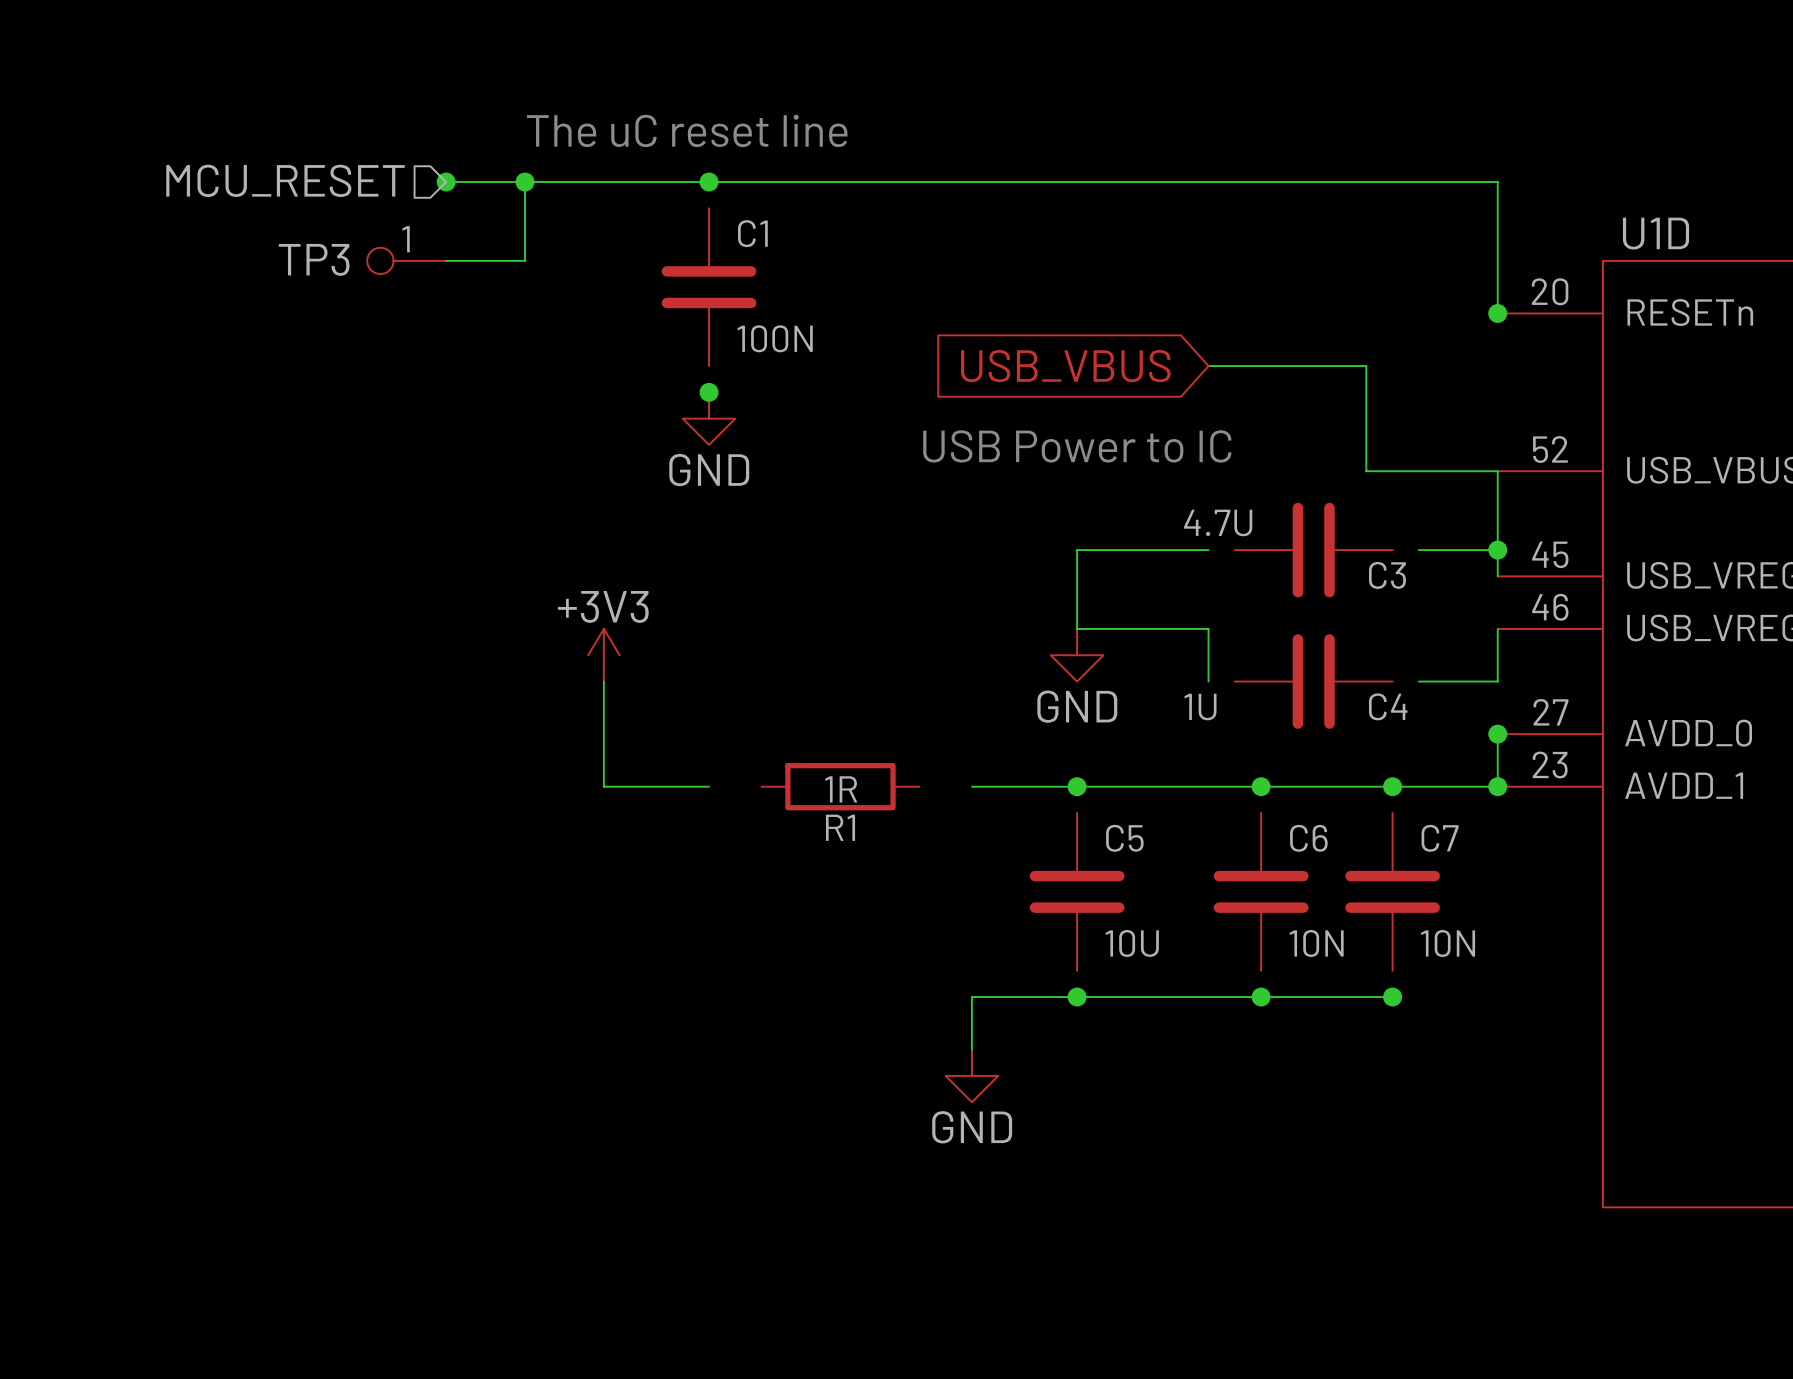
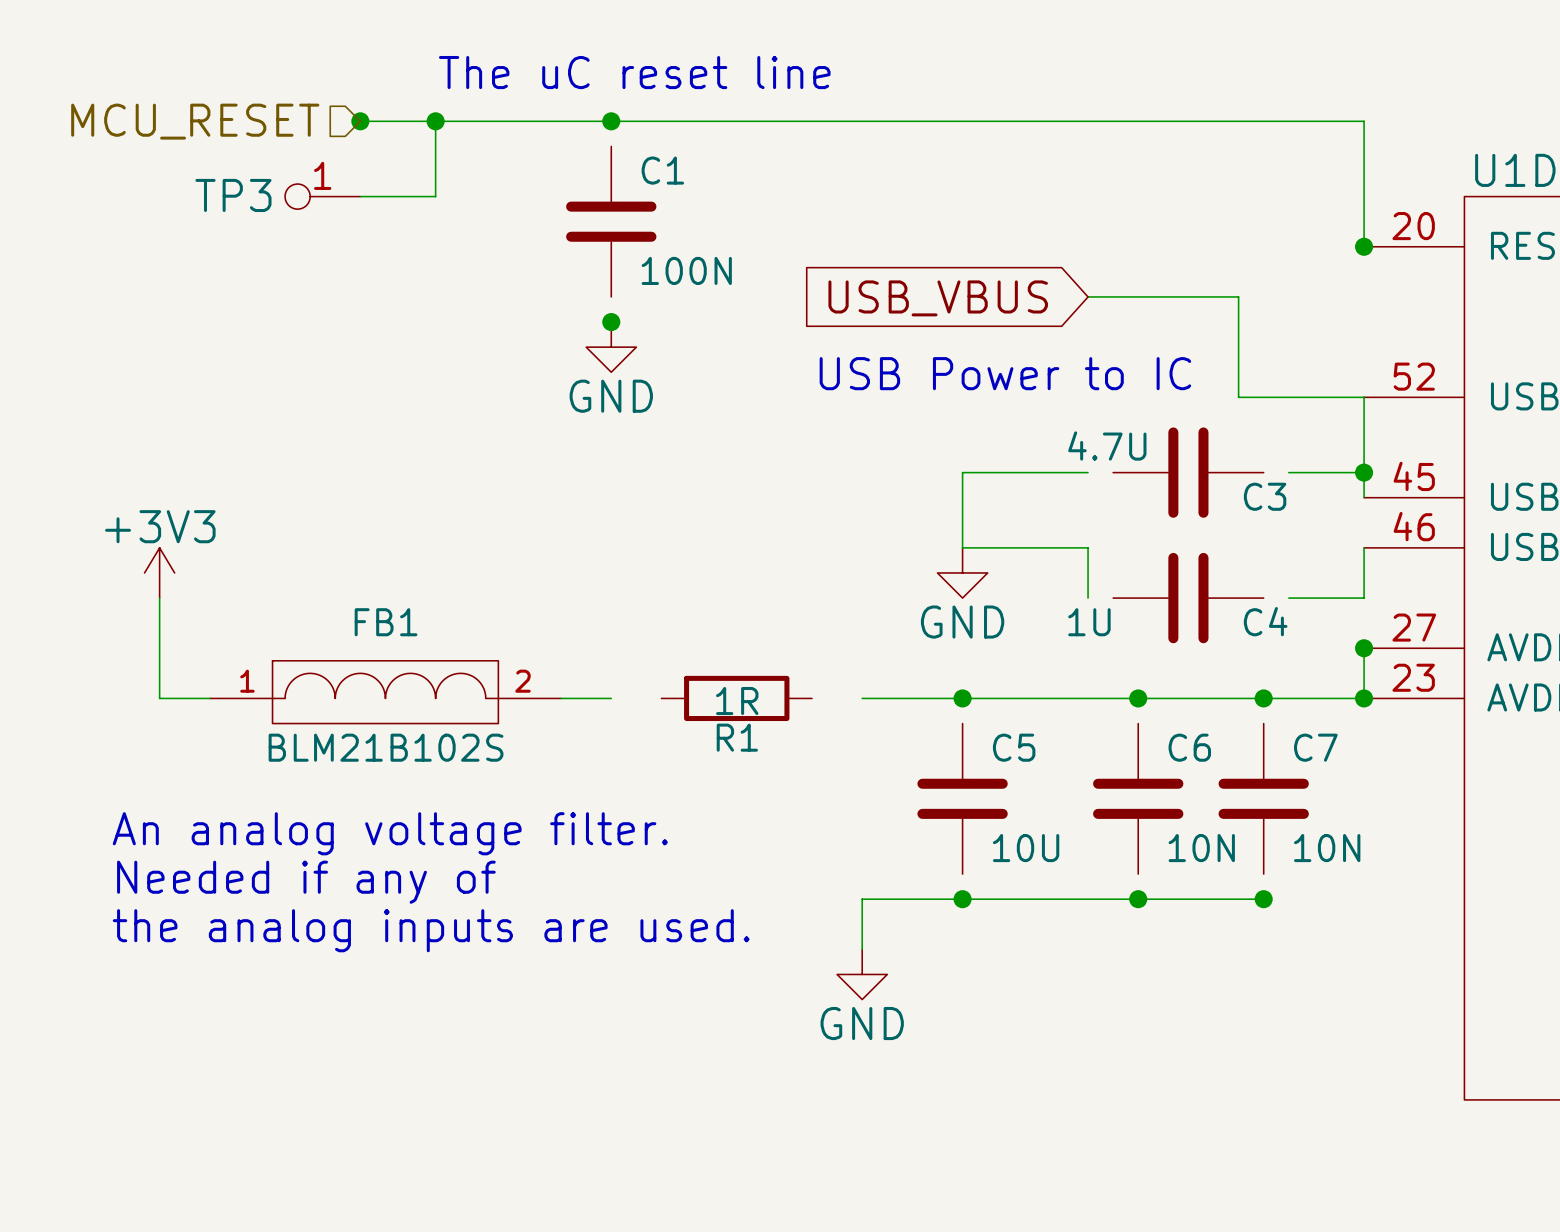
power symbol position: +3V3 (603, 655) -> +3V3 (159, 572)
wire: (603, 681) (603, 786) (656, 786) -> (159, 598) (159, 698) (209, 698)
FB1: none -> BLM21B102S (385, 692)
text: none -> An analog voltage filter. (390, 833)
text: none -> Needed if any of (306, 882)
text: none -> the analog inputs are used. (431, 930)

